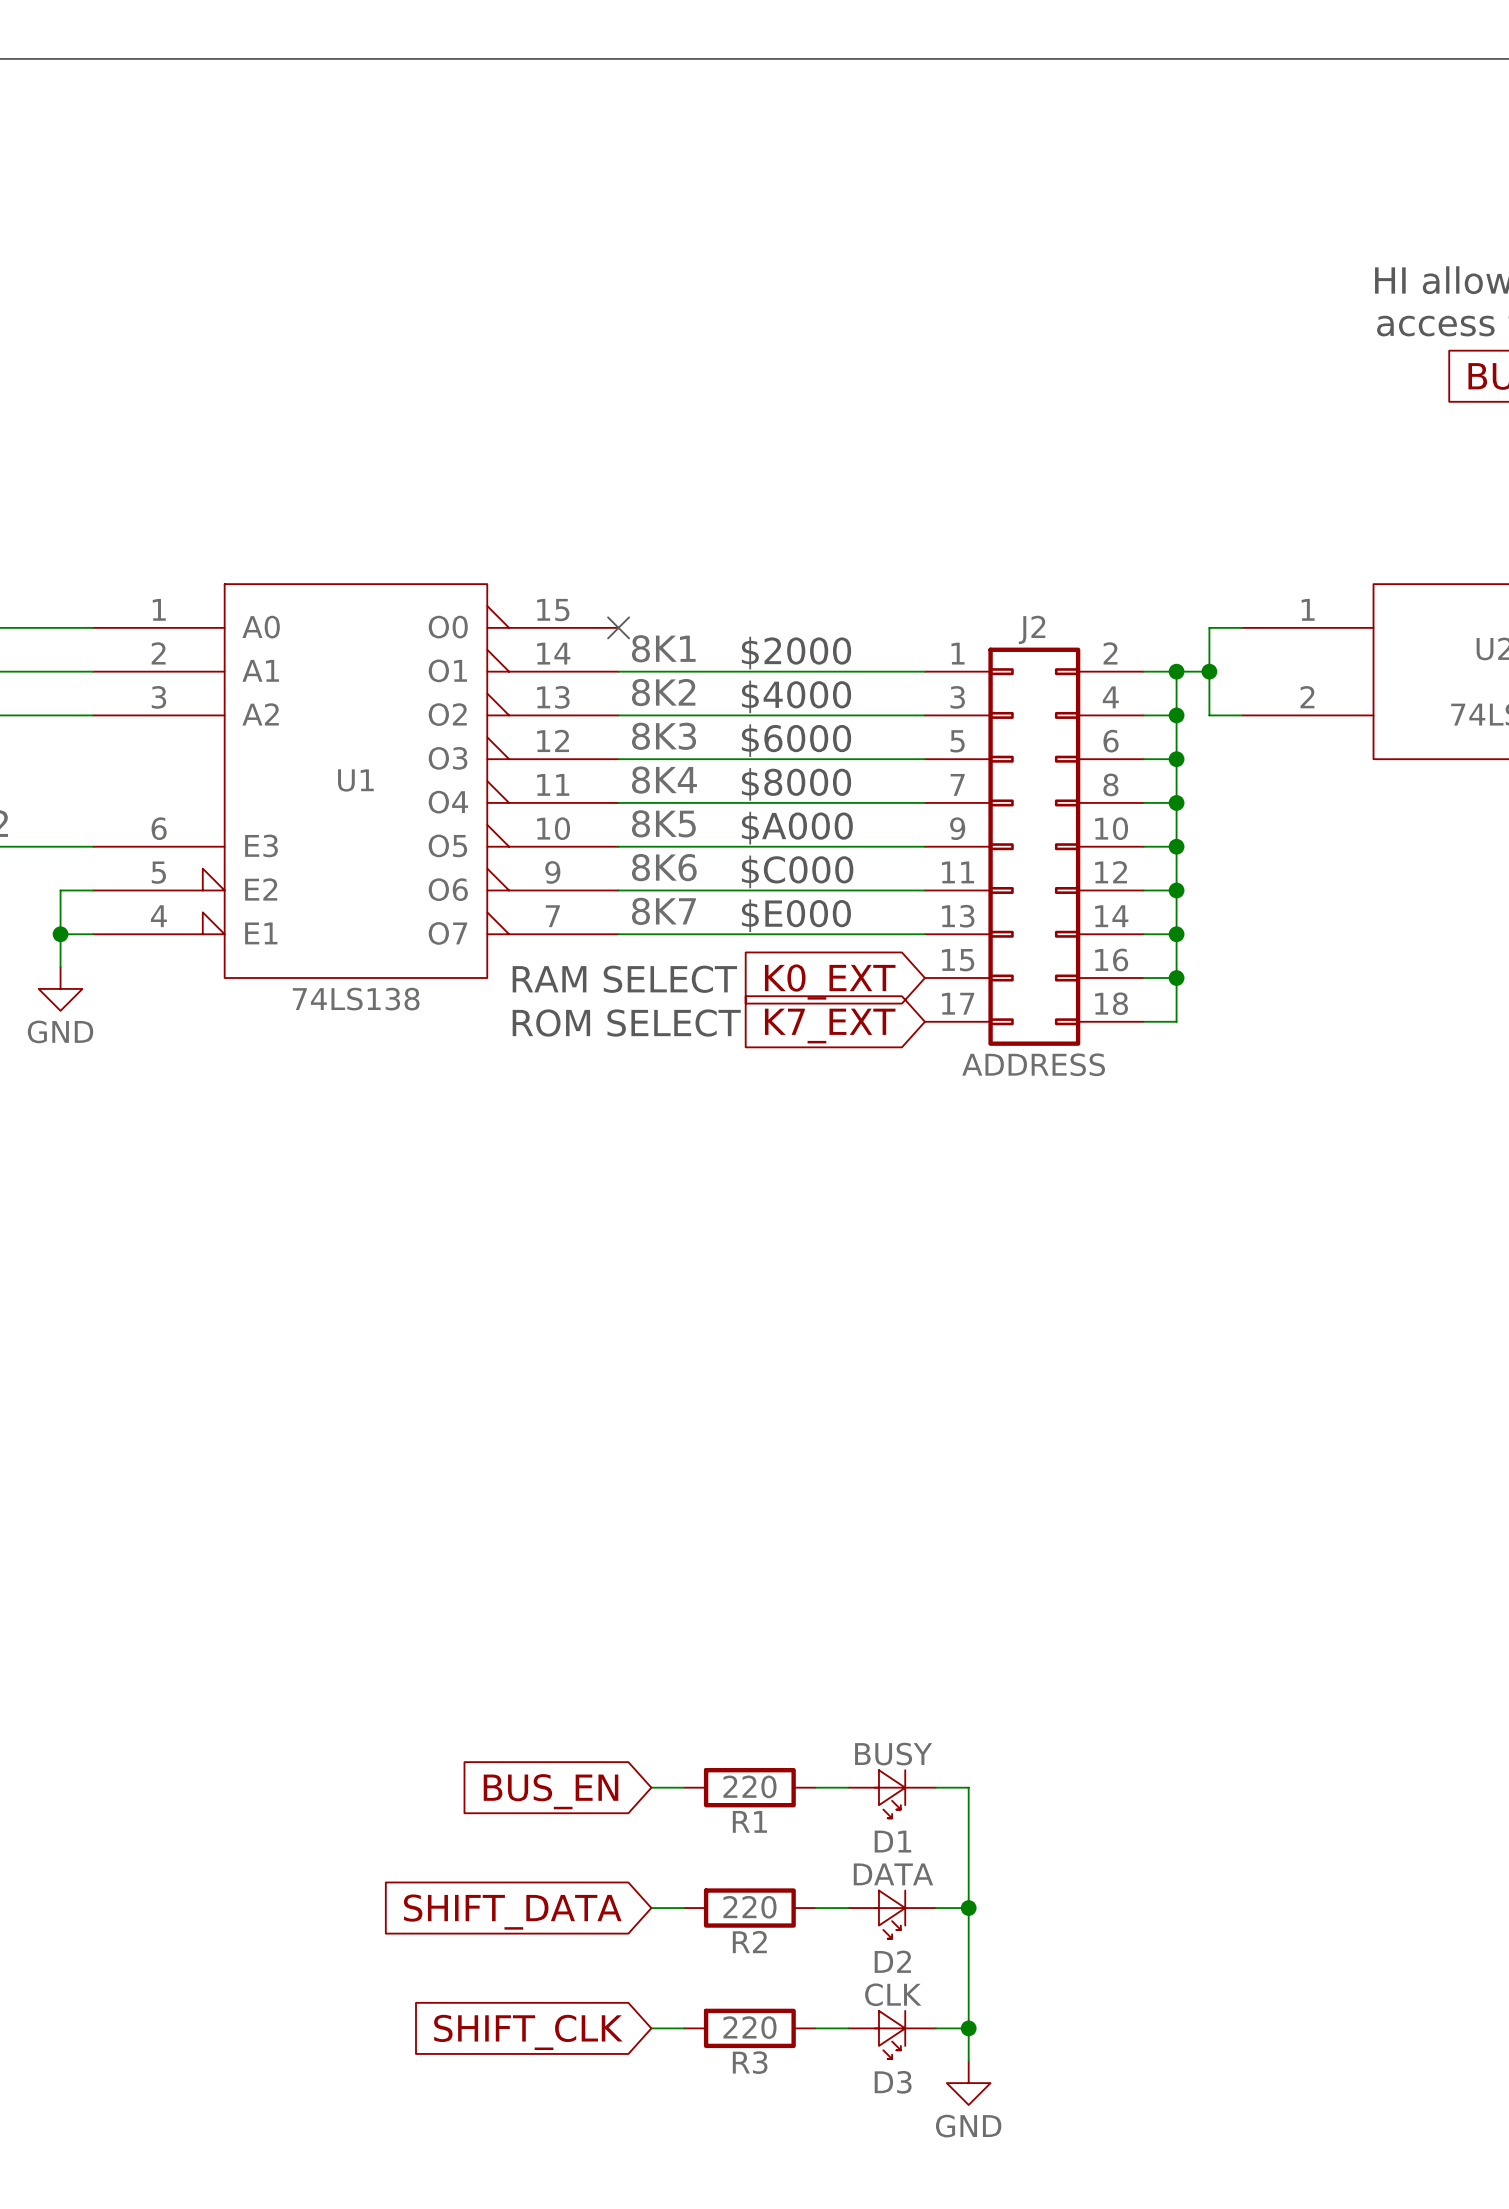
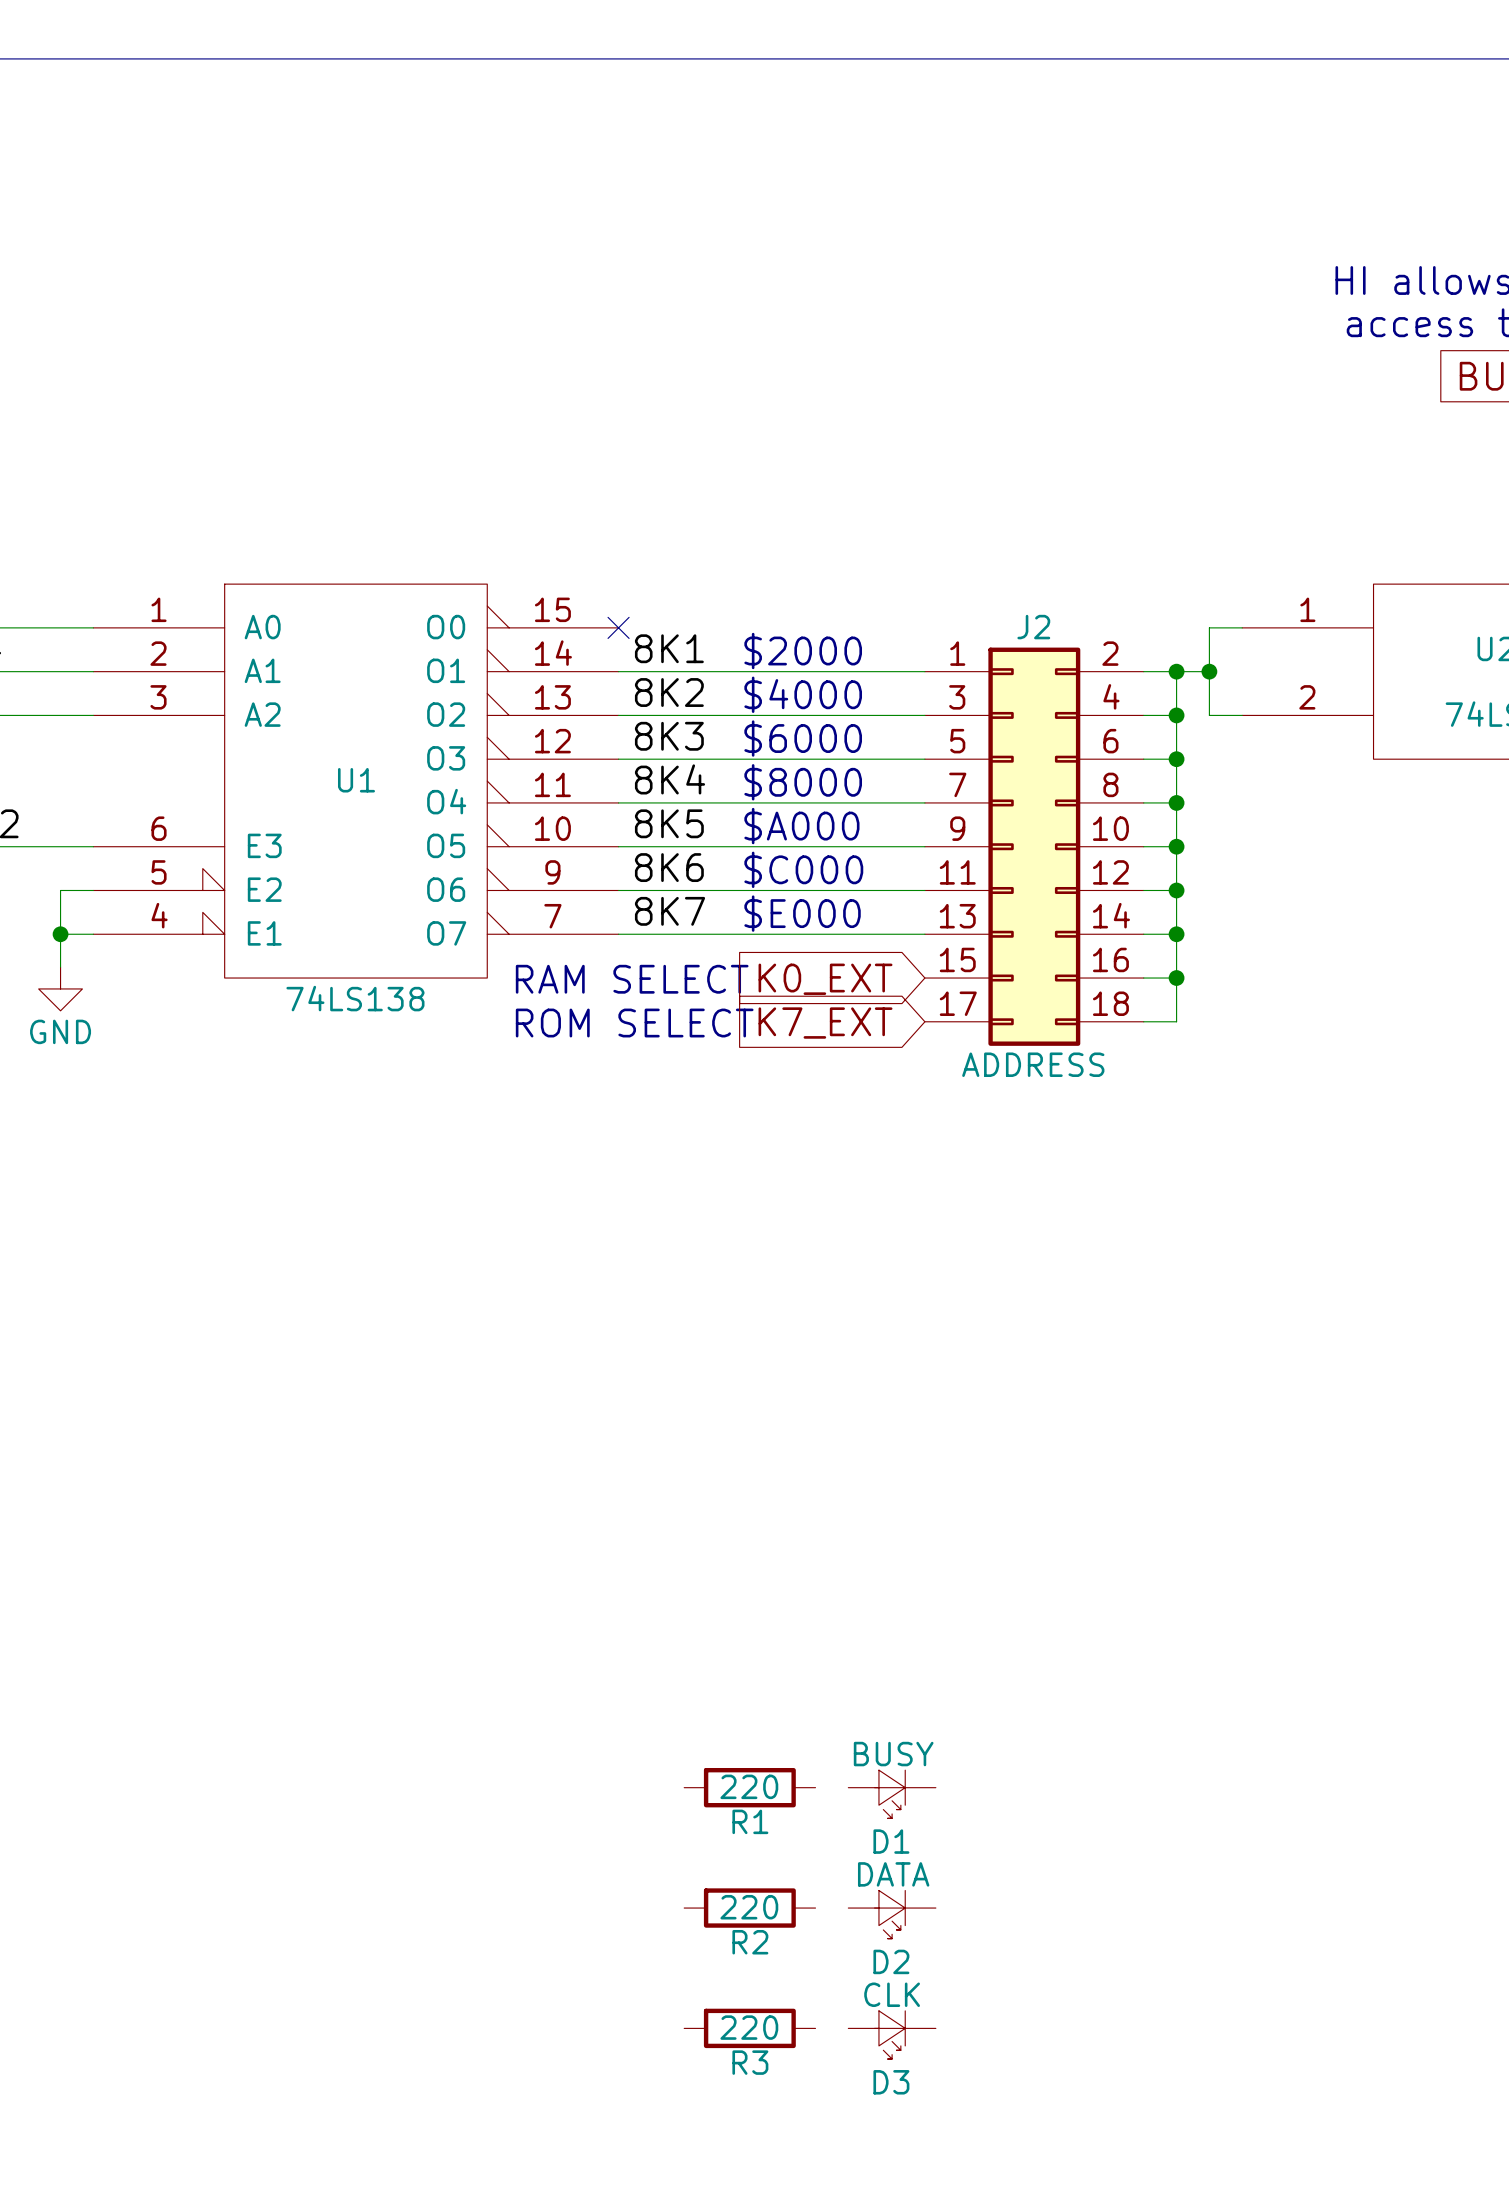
wire: (651, 1787) (684, 1787) -> none
wire: (815, 1787) (848, 1787) -> none
wire: (935, 1787) (968, 1787) (968, 2061) -> none
global label: BUS_EN (551, 1791) -> none
wire: (651, 1908) (684, 1908) -> none
wire: (815, 1908) (848, 1908) -> none
wire: (935, 1908) (968, 1908) -> none
junction: (968, 1908) -> none
global label: SHIFT_DATA (512, 1912) -> none
wire: (651, 2028) (684, 2028) -> none
wire: (815, 2028) (848, 2028) -> none
wire: (935, 2028) (968, 2028) -> none
junction: (968, 2028) -> none
global label: SHIFT_CLK (528, 2032) -> none
power symbol: GND (968, 2083) -> none

